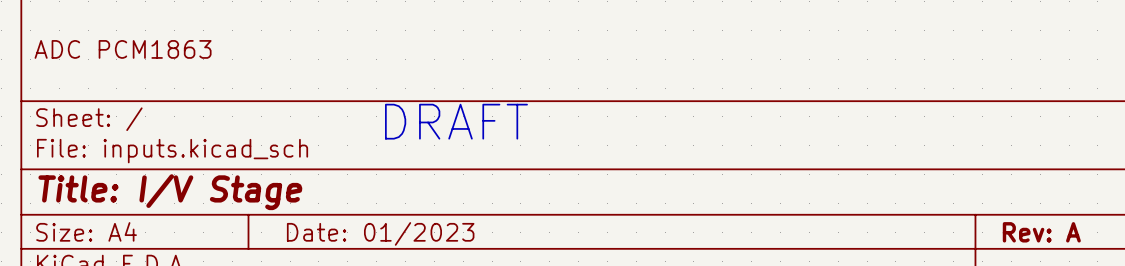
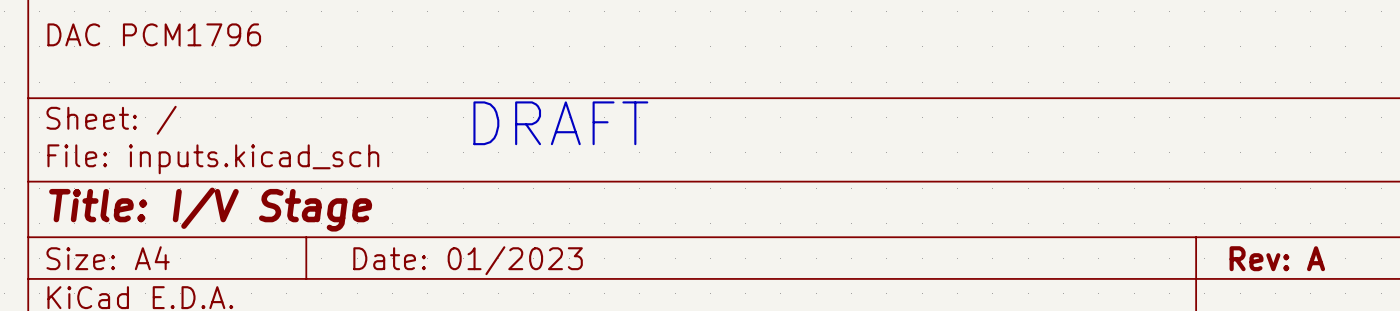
title block: ADC PCM1863 (123, 49) -> DAC PCM1796 (154, 34)

